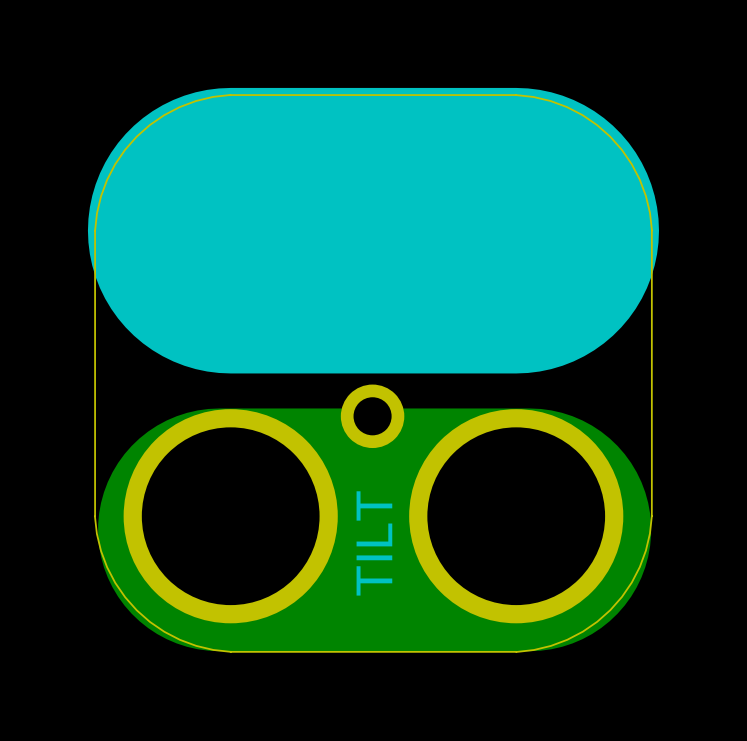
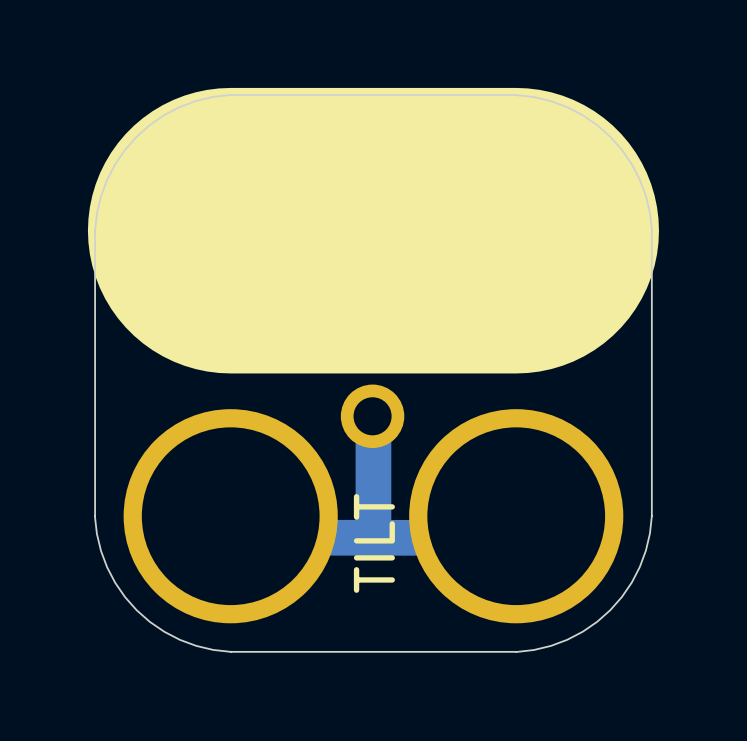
part footprint: [87, 87, 659, 653] -> [87, 87, 659, 653]

